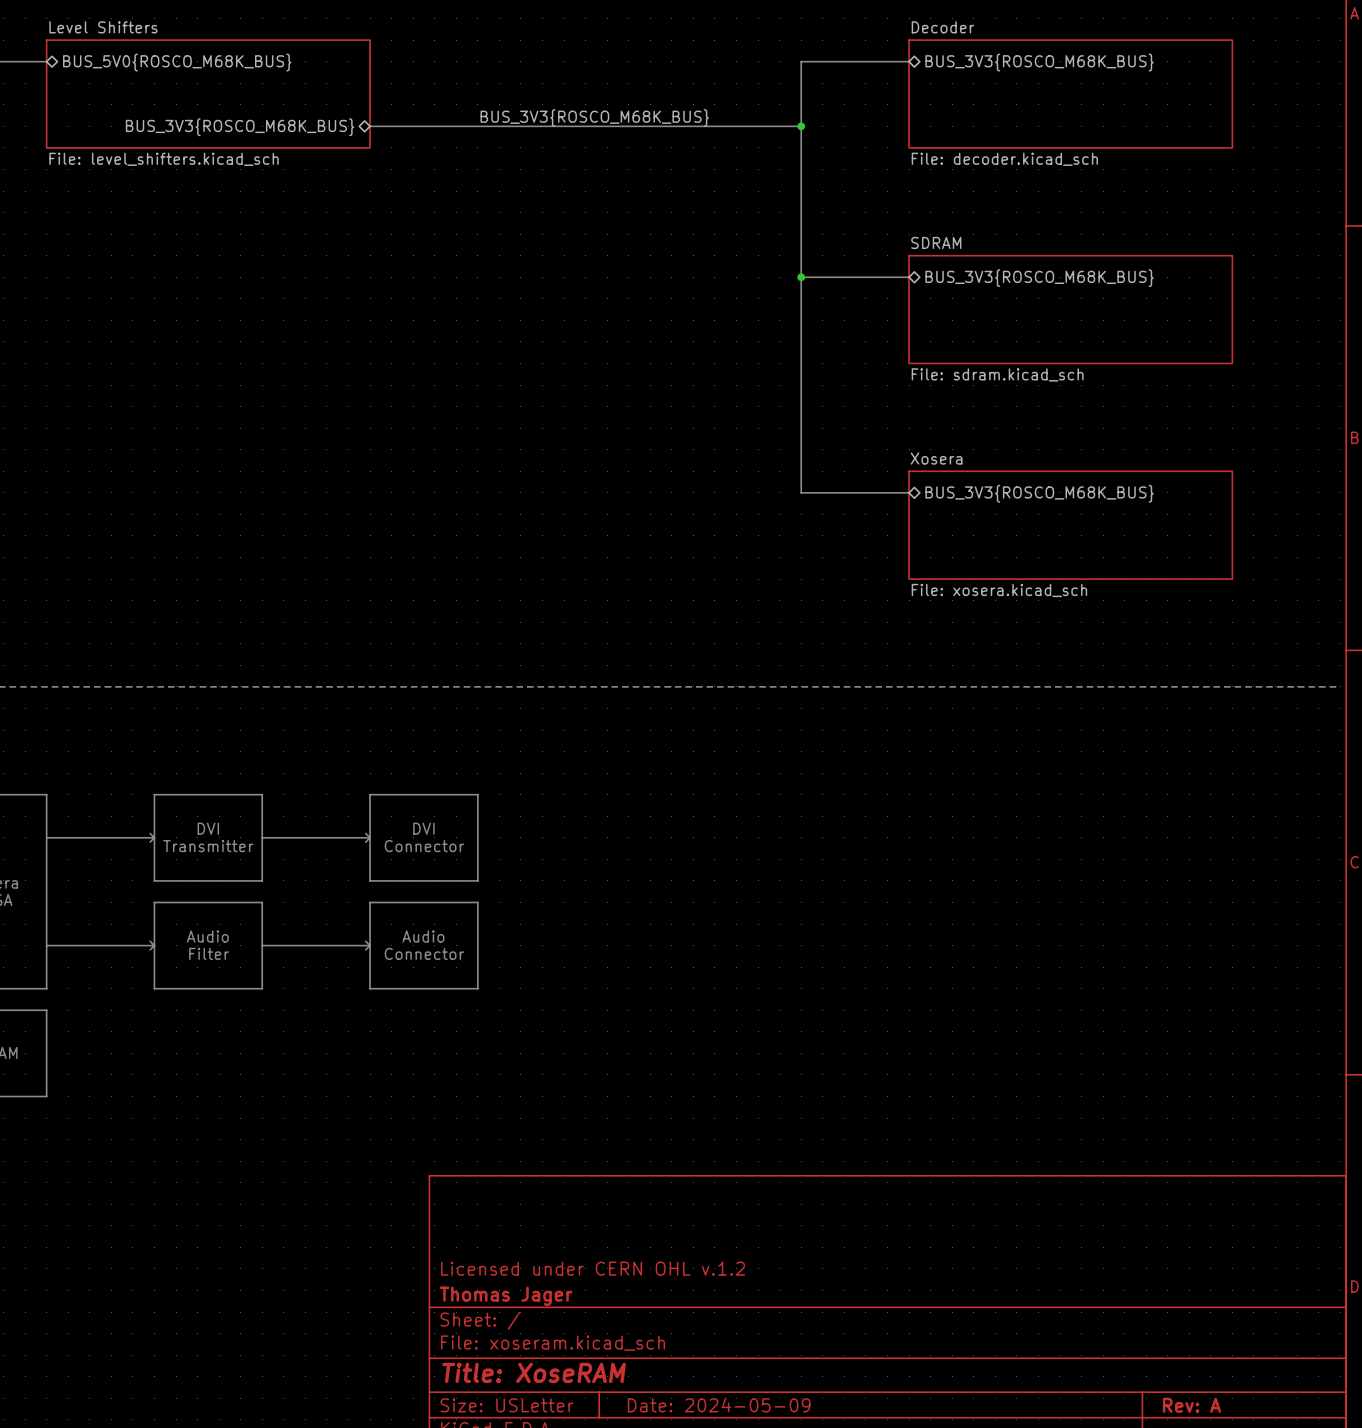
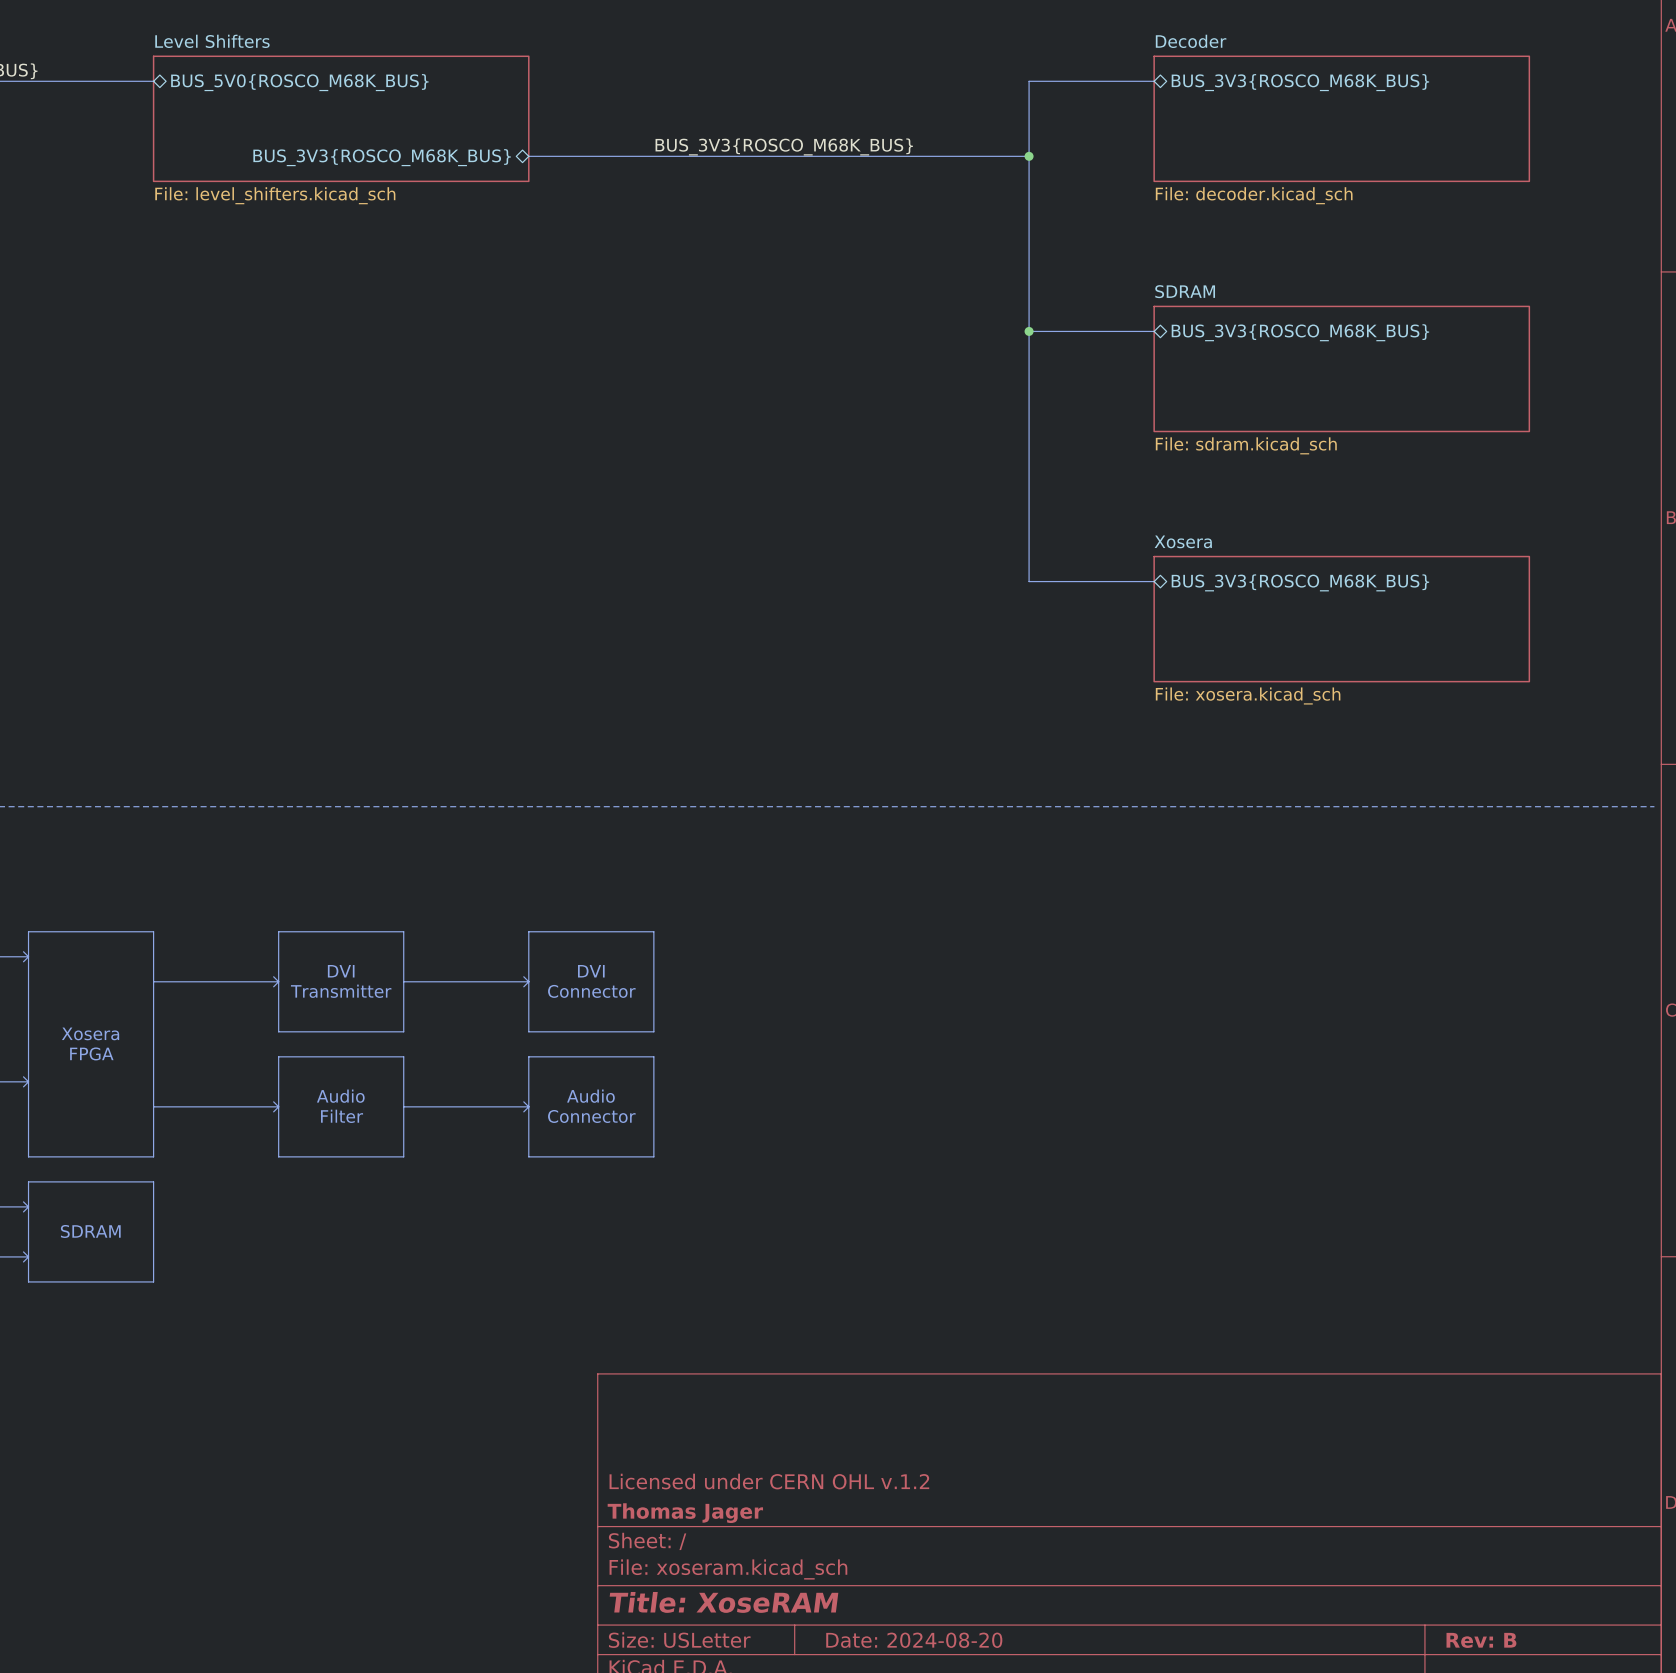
title block: Date: 2024-05-09 (719, 1405) -> Date: 2024-08-20 (914, 1640)
title block: Rev: A (1192, 1405) -> Rev: B (1481, 1640)

